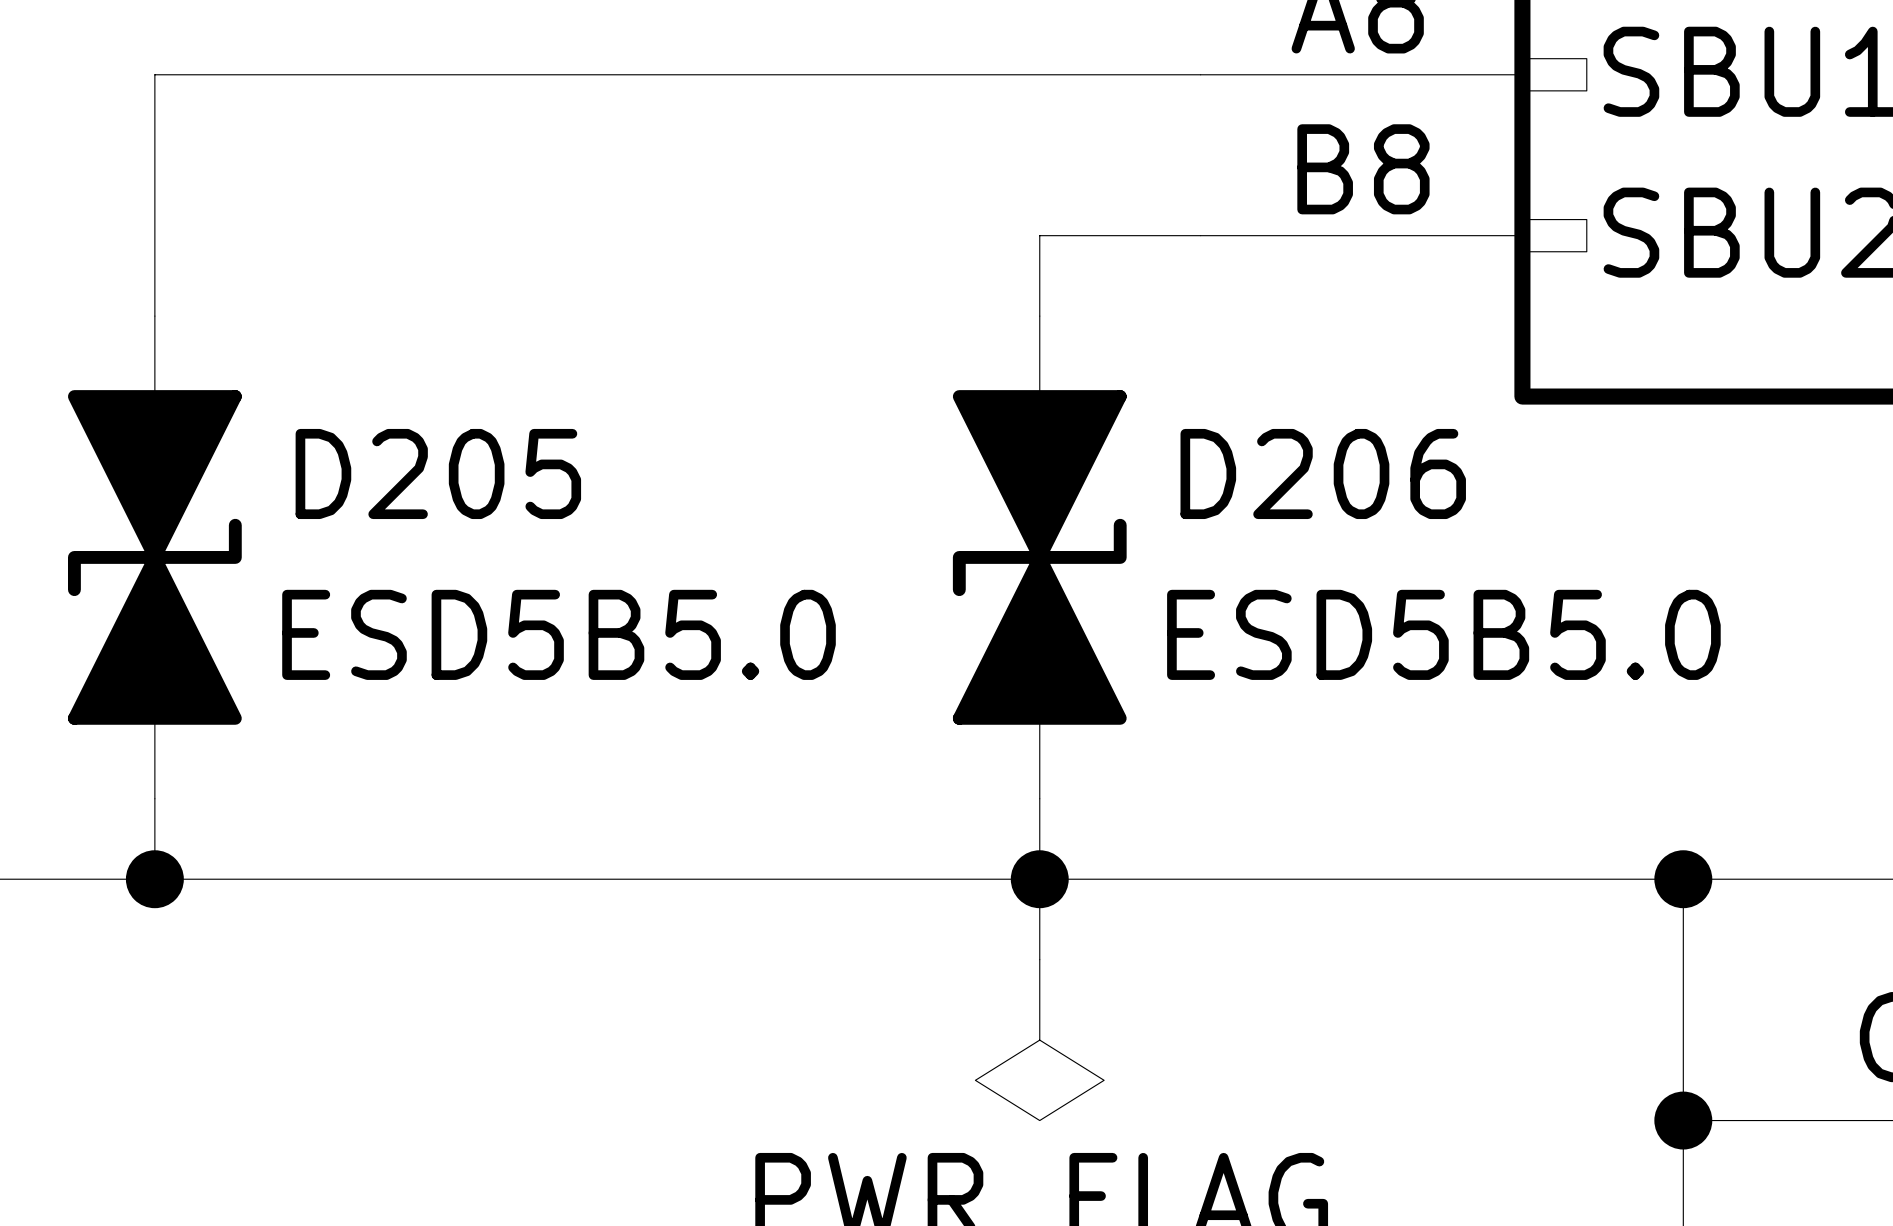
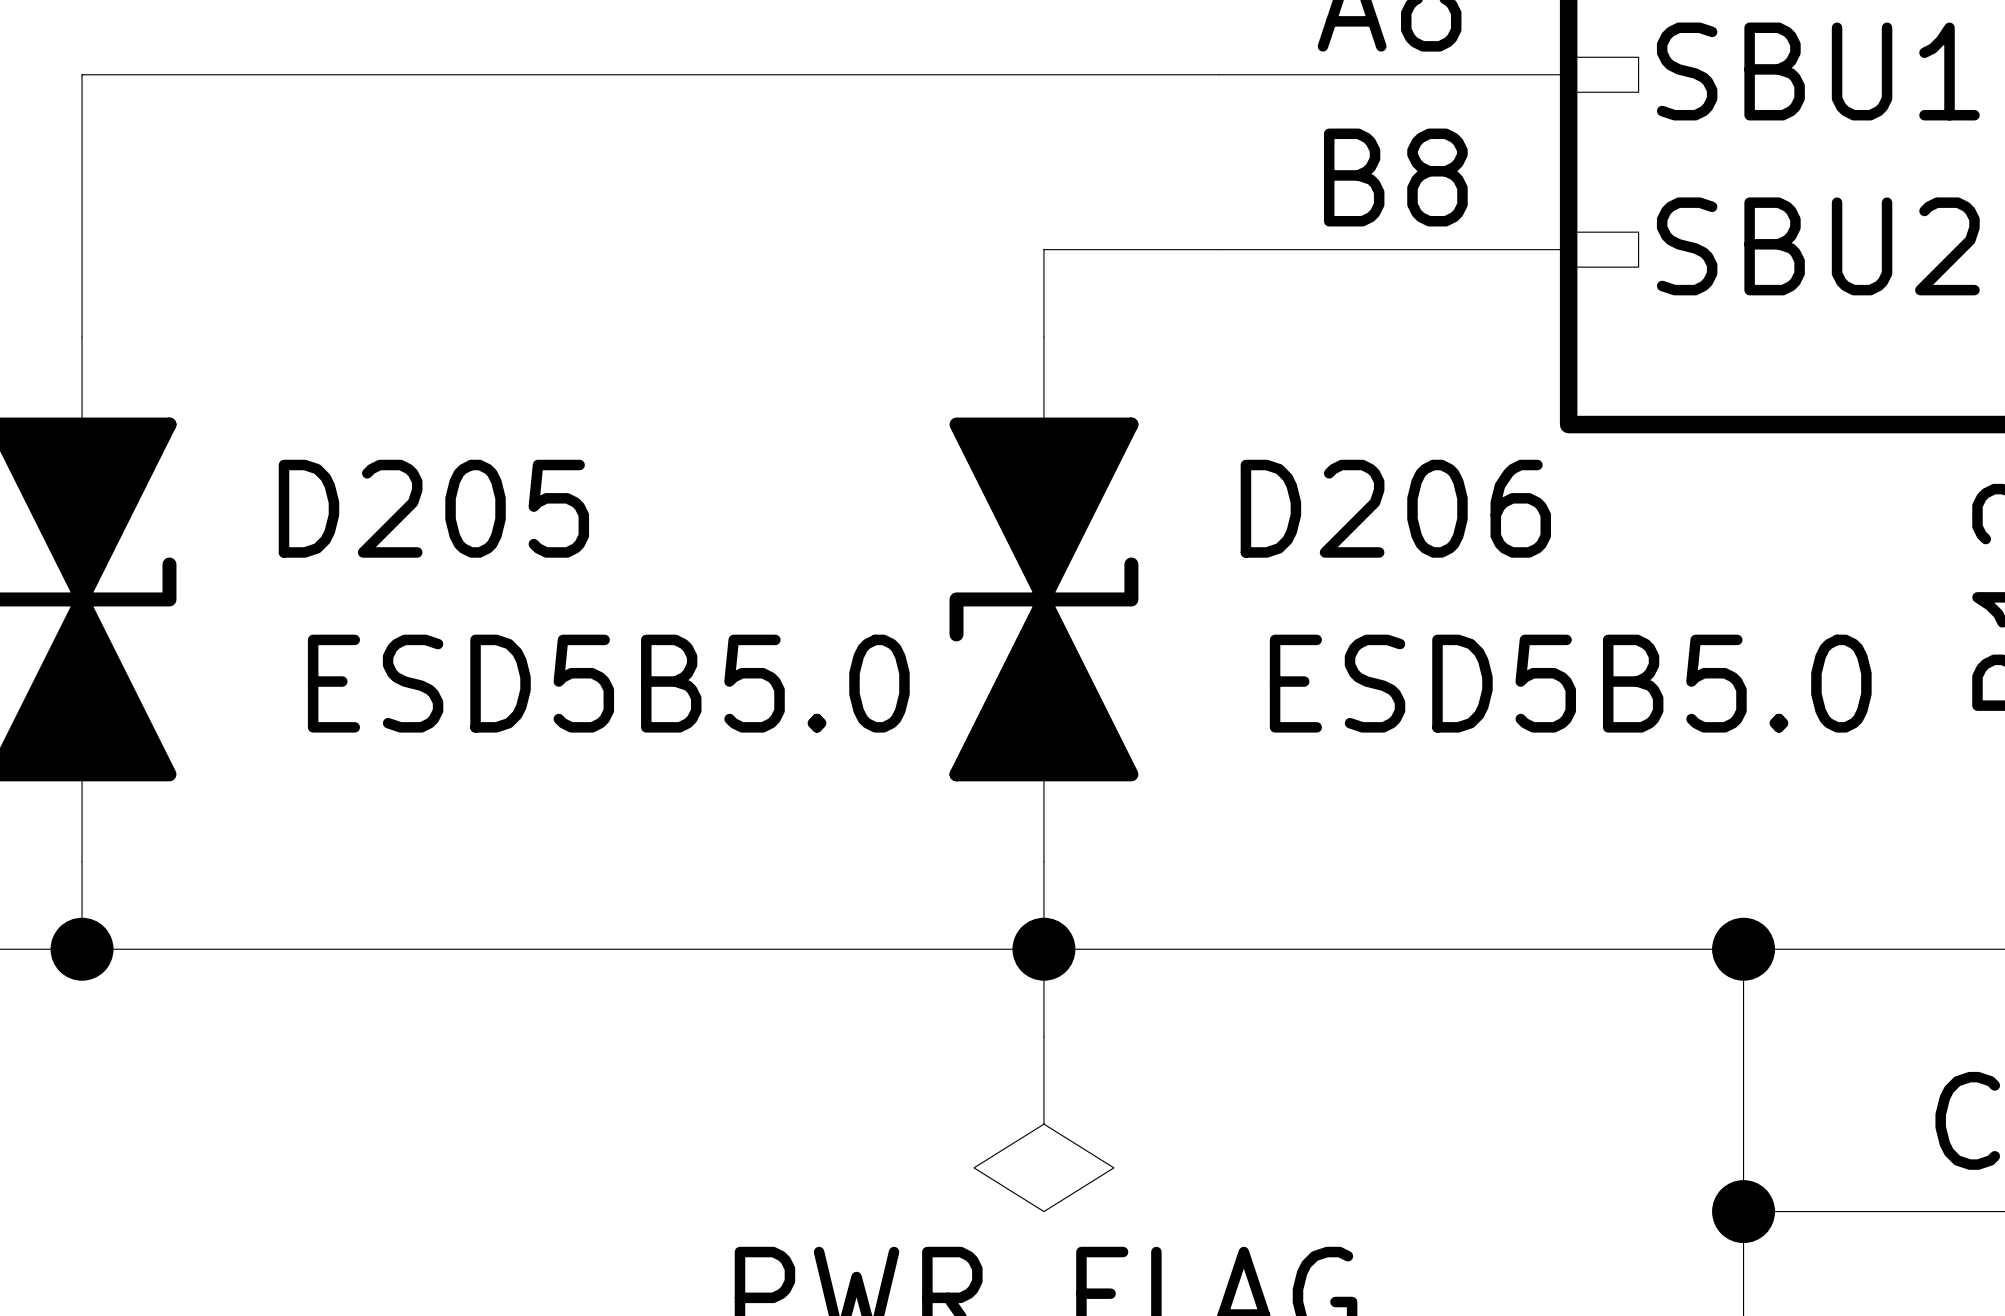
D205 name position: D205 (438, 473) -> D205 (433, 508)
D206 name position: D206 (1323, 473) -> D206 (1395, 508)
D205 value position: ESD5B5.0 (559, 634) -> ESD5B5.0 (608, 683)
D206 value position: ESD5B5.0 (1443, 634) -> ESD5B5.0 (1570, 683)

